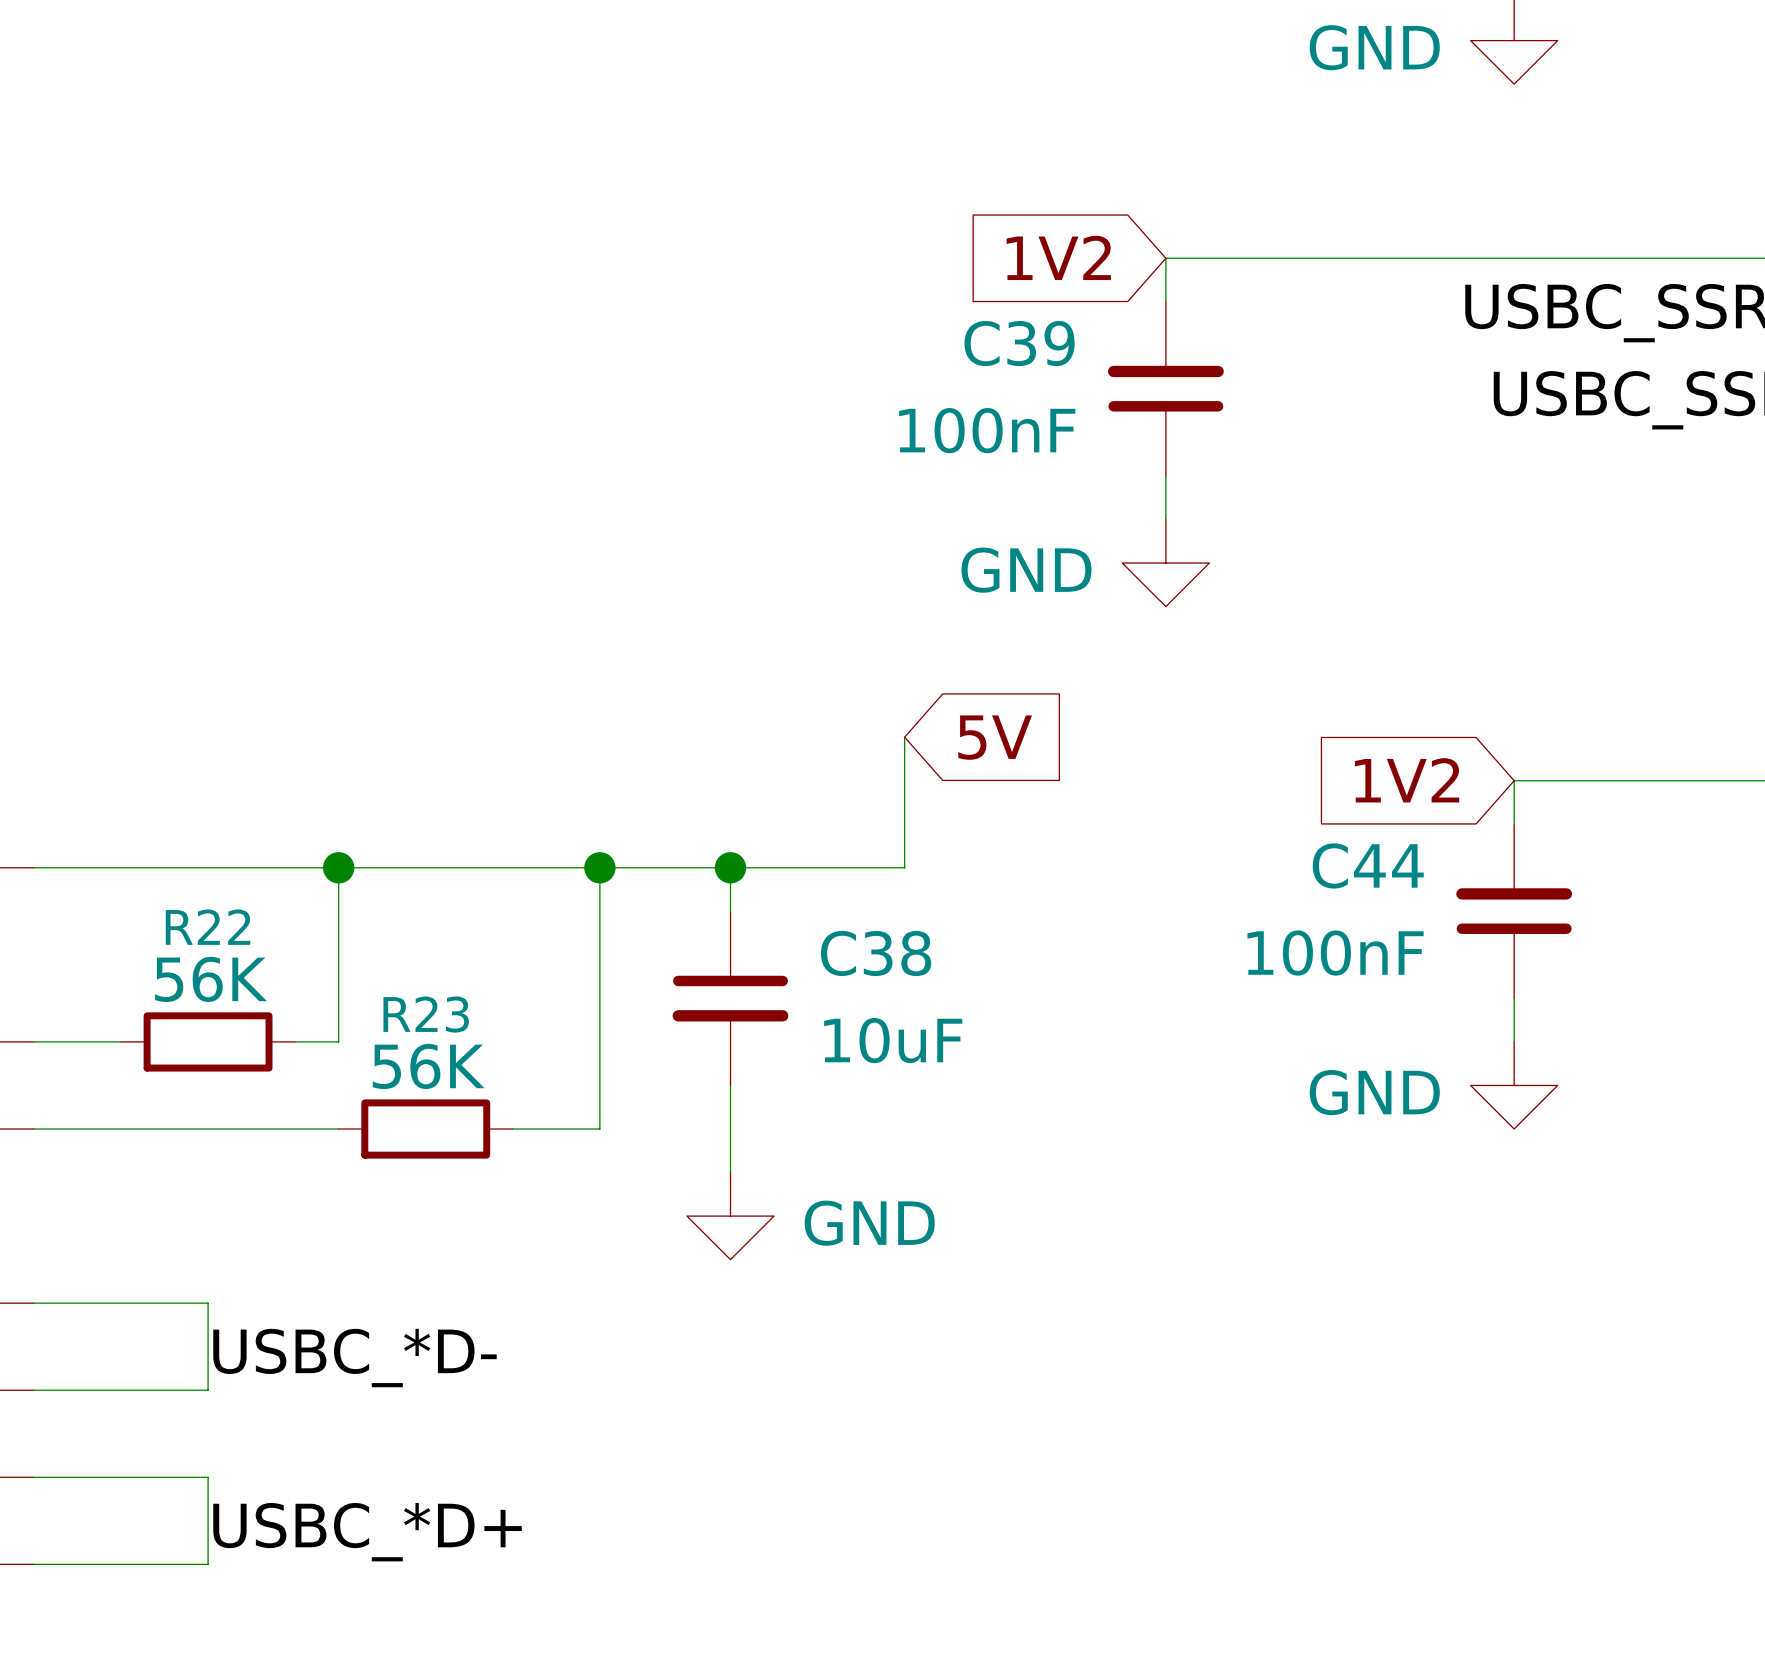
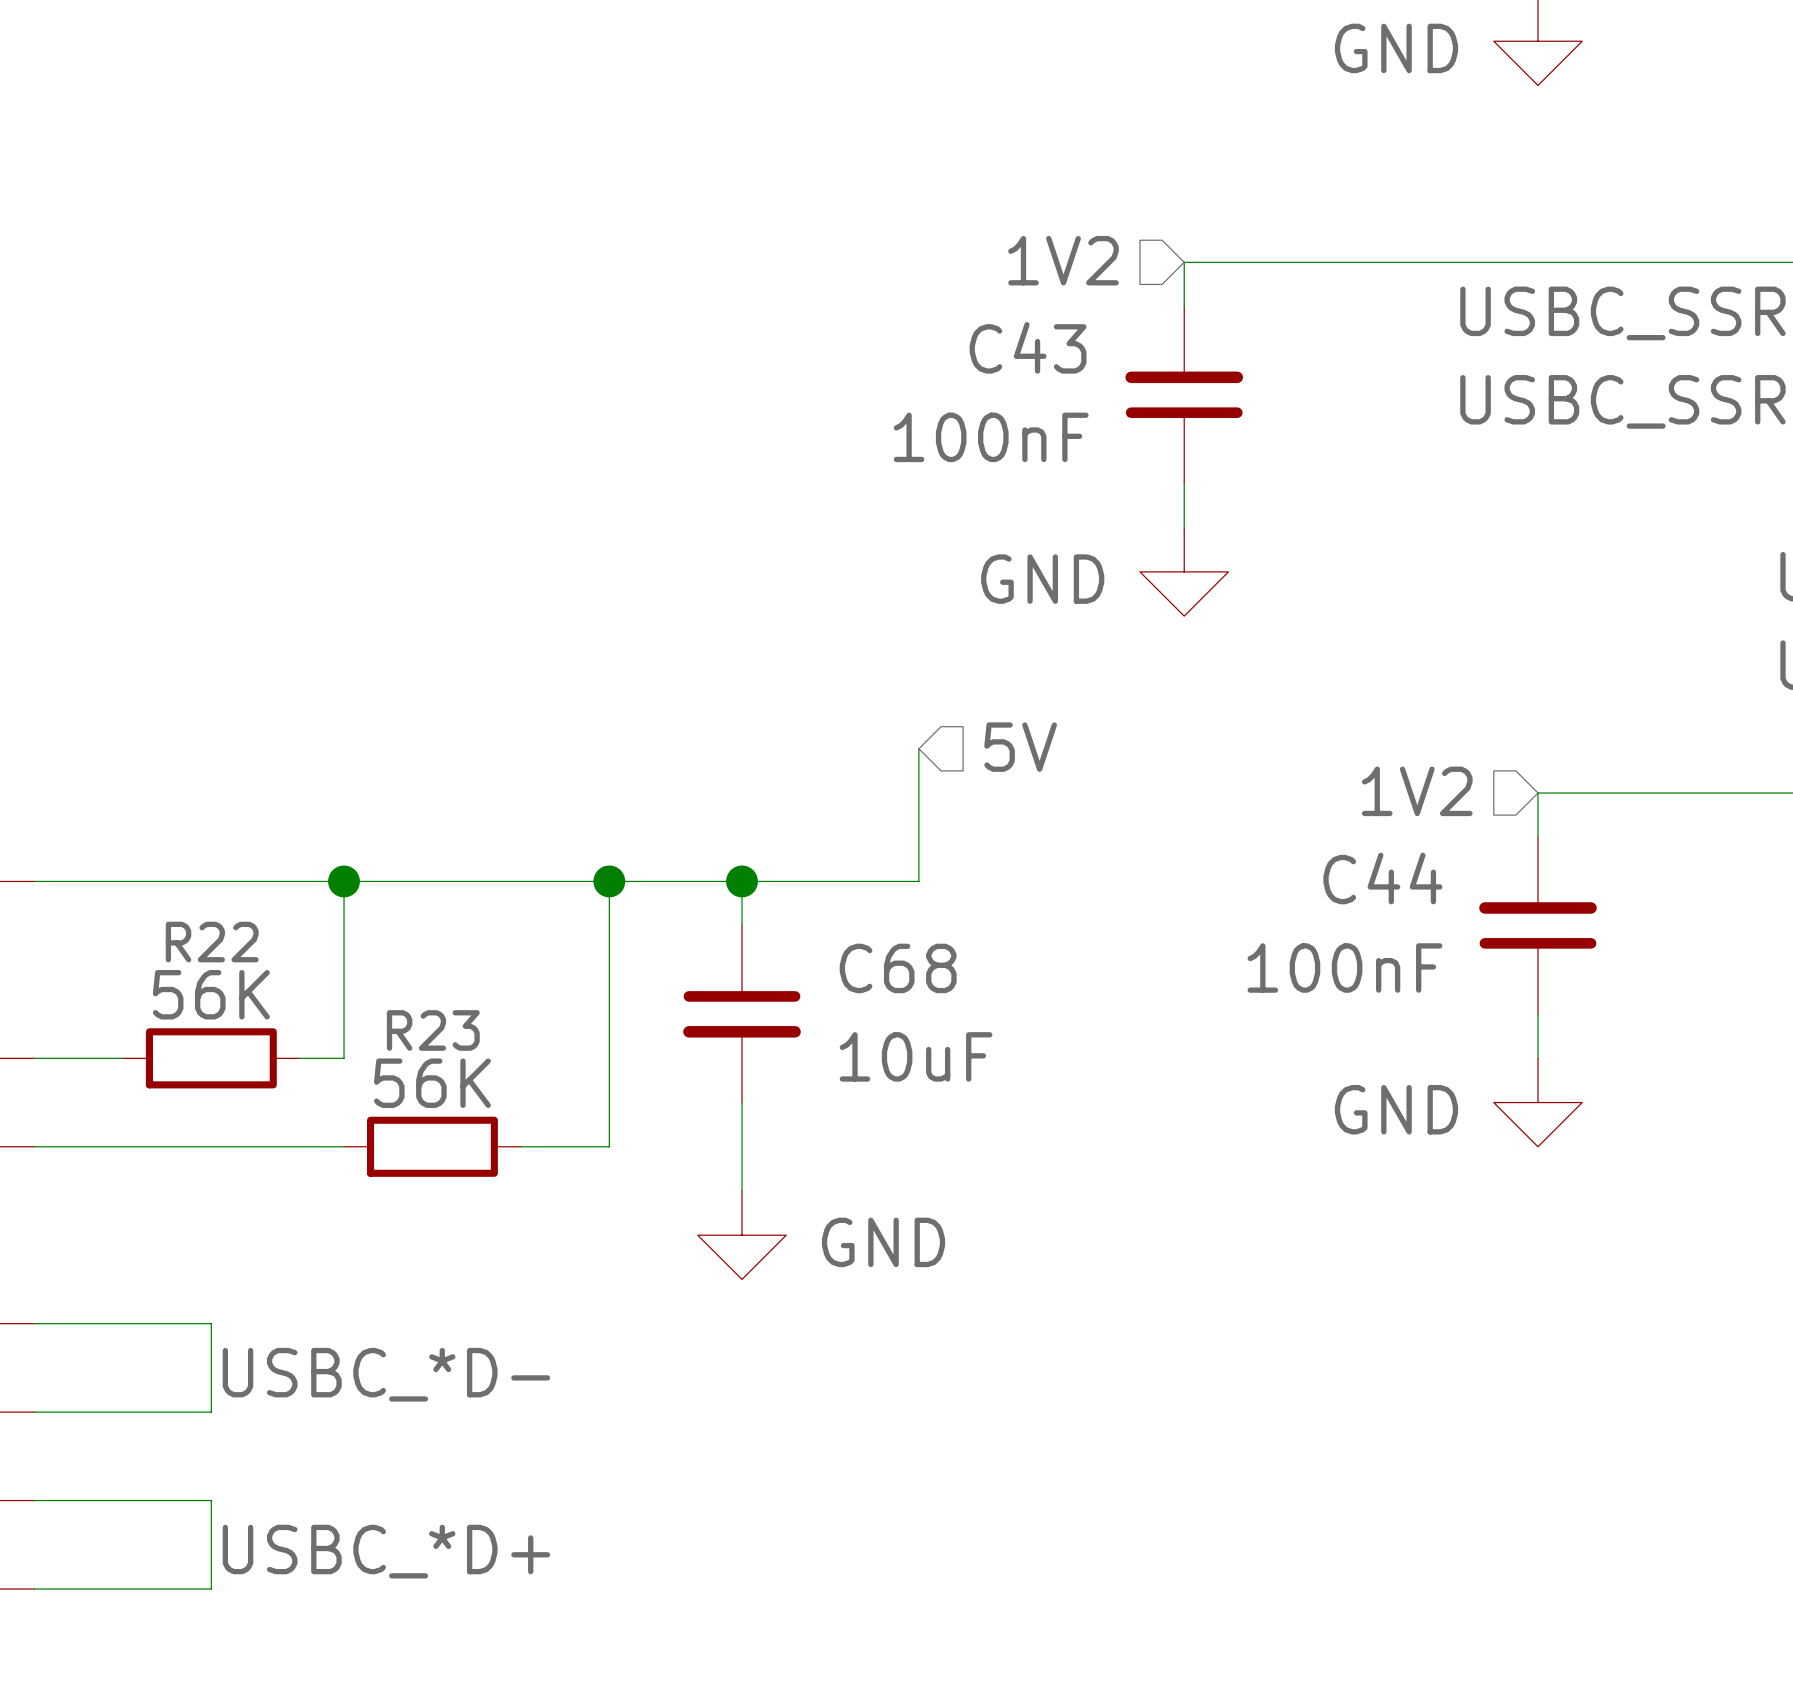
hierarchical label: none -> 1V2 (1063, 260)
global label: 1V2 (1058, 257) -> none
C39 name: C39 (1019, 343) -> C43 (1028, 347)
hierarchical label: none -> 5V (1020, 747)
global label: 5V (995, 737) -> none
hierarchical label: none -> 1V2 (1417, 791)
global label: 1V2 (1407, 780) -> none
C38 name: C38 (876, 953) -> C68 (898, 968)

